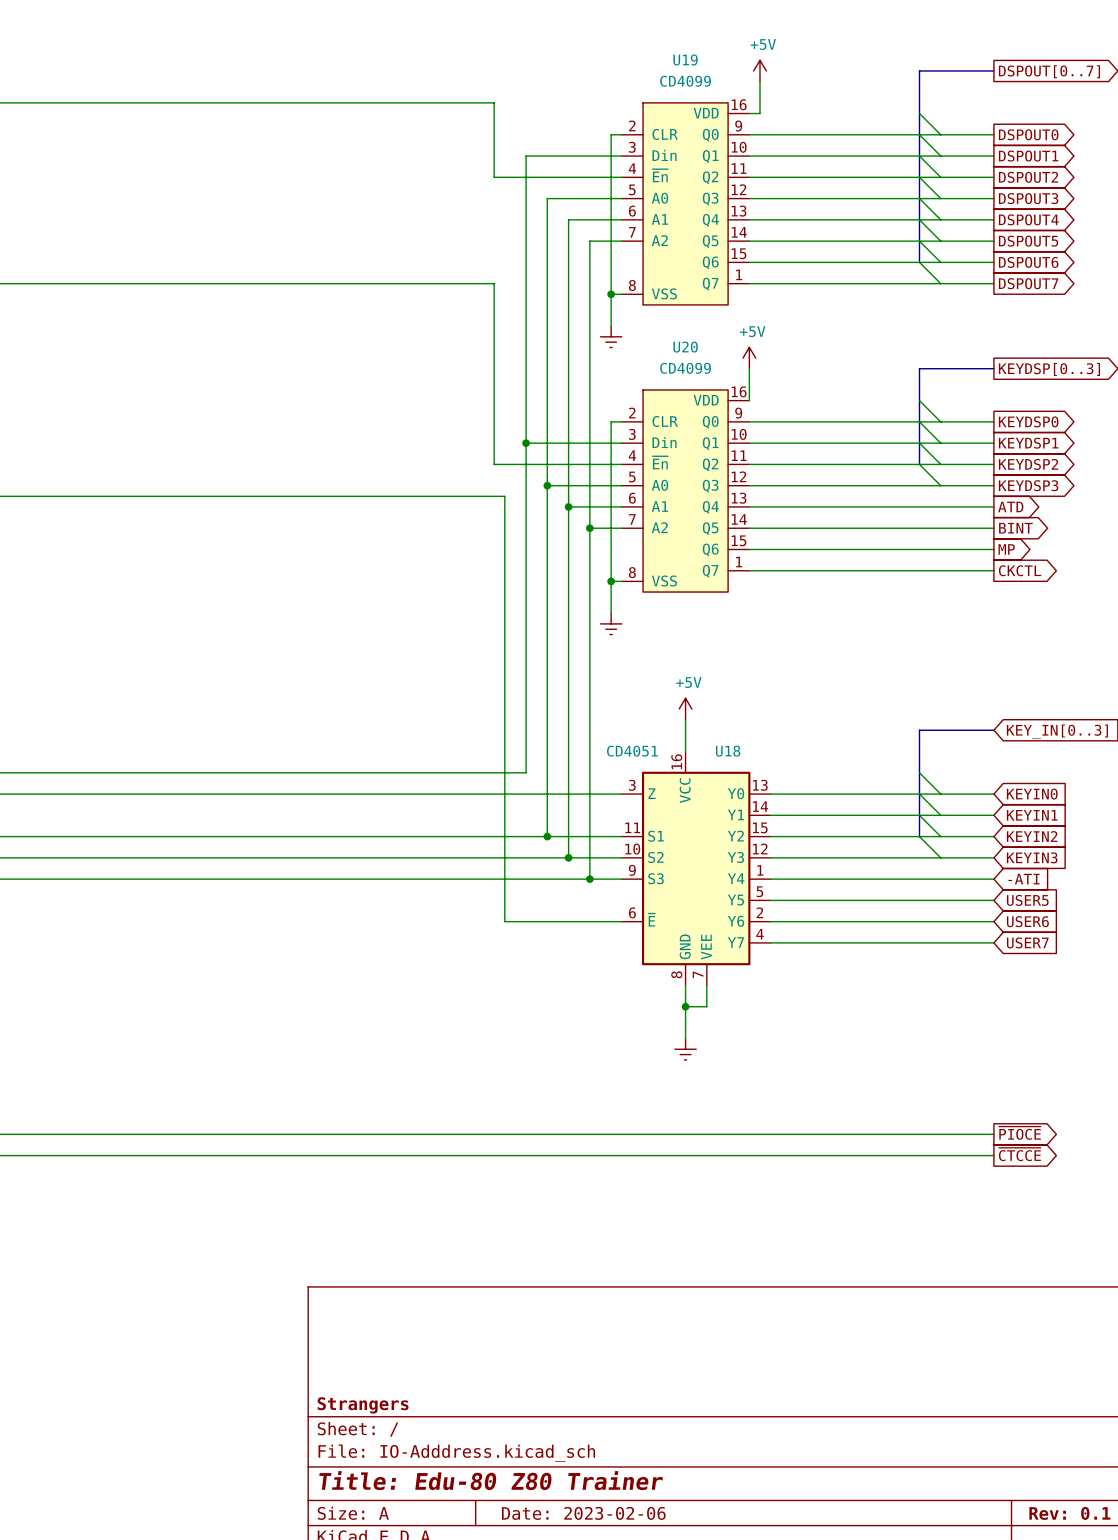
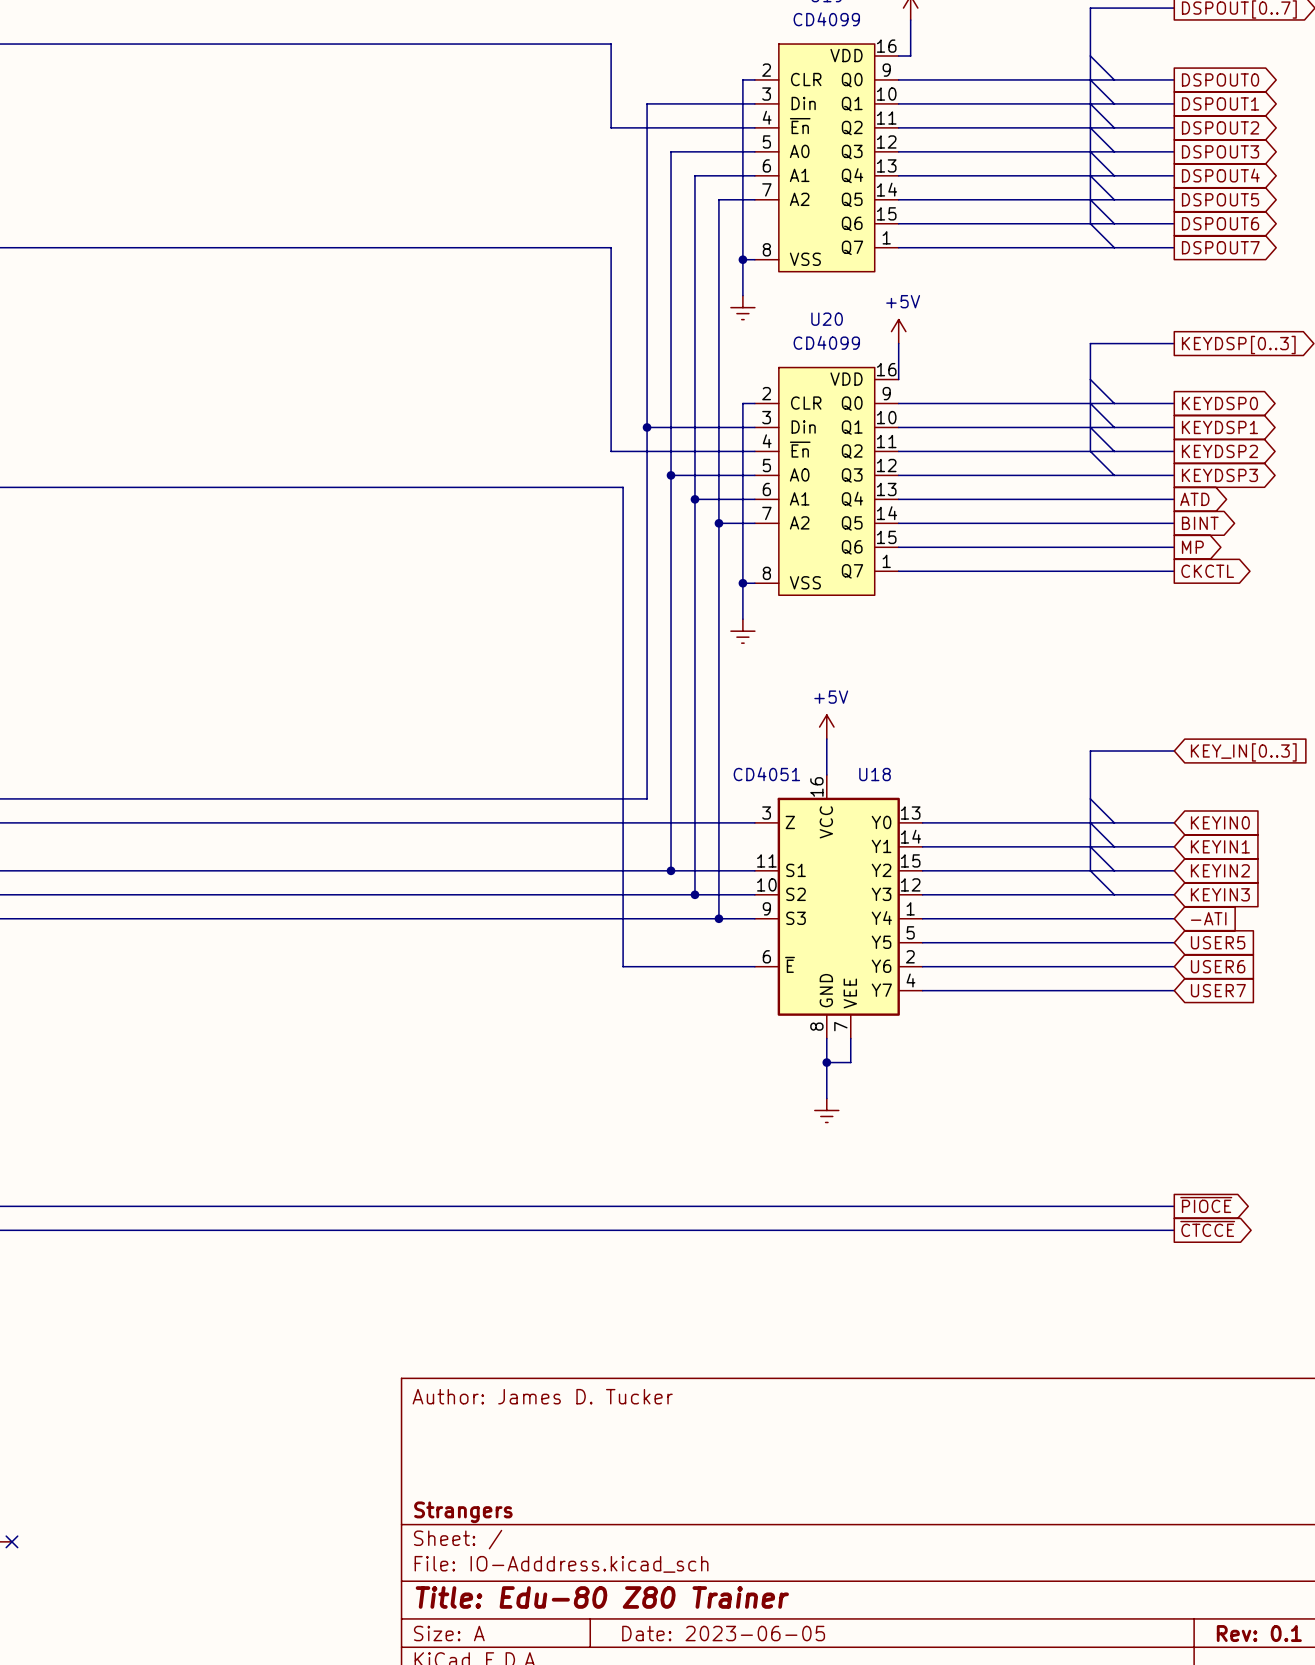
title block: none -> Author: James D. Tucker (542, 1396)
title block: Date: 2023-02-06 (583, 1513) -> Date: 2023-06-05 (723, 1633)

